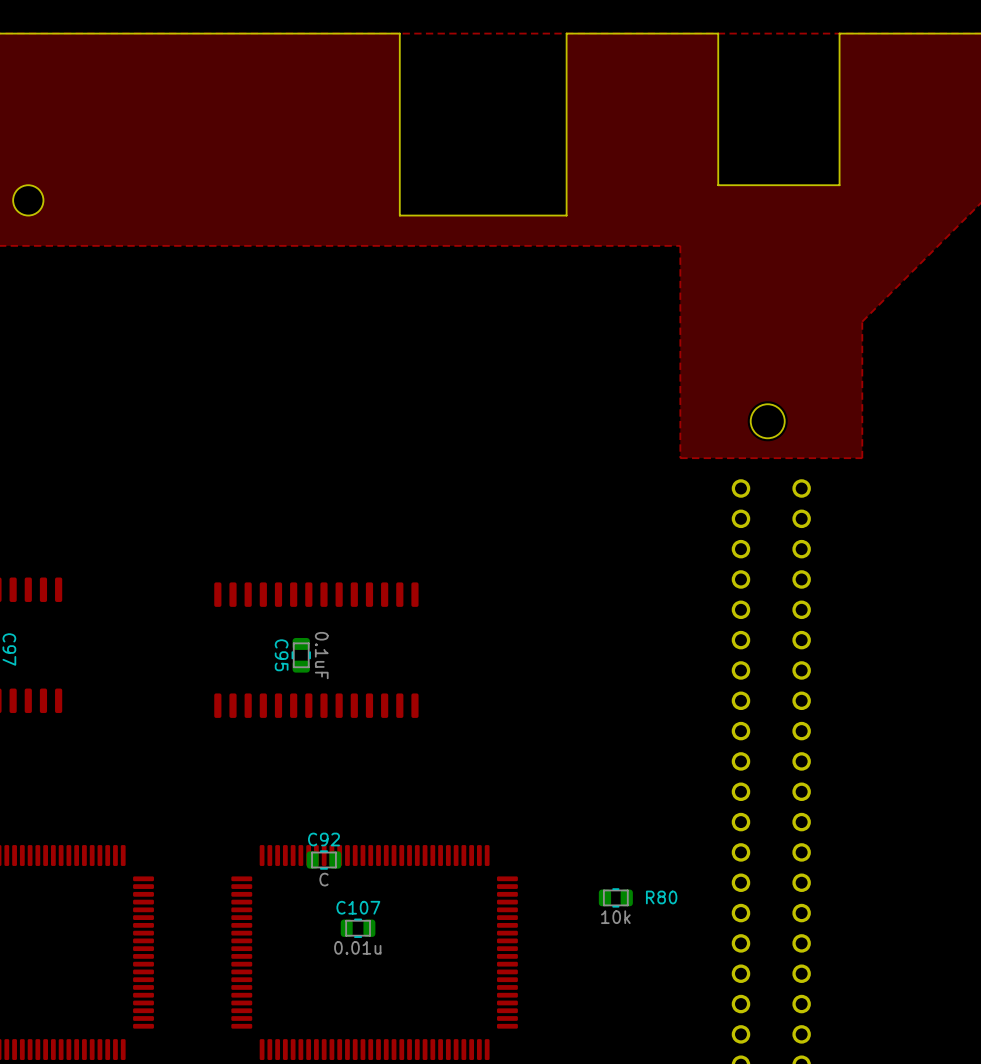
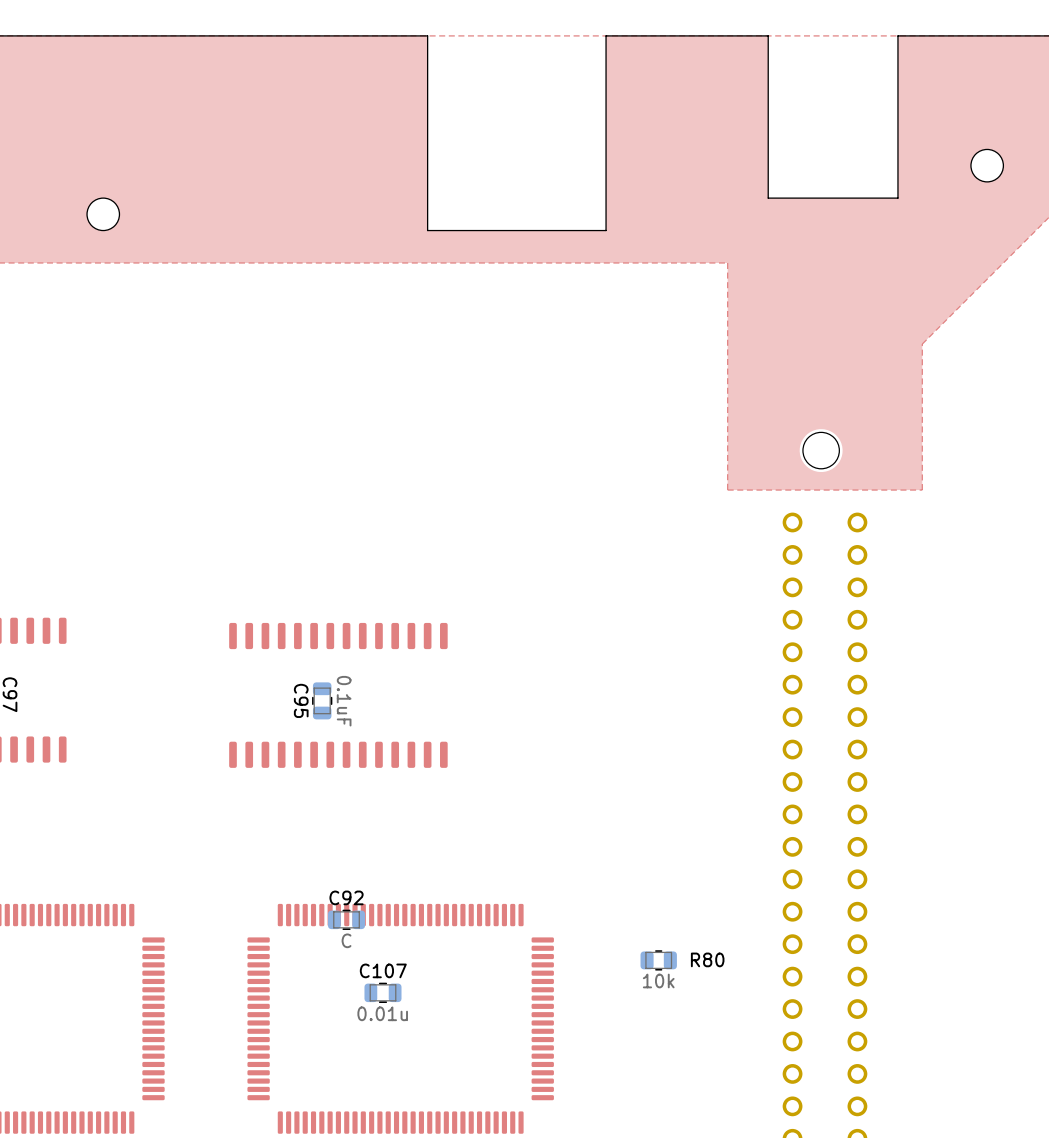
round board edge: none -> [970, 148, 1005, 183]
round board edge position: (28, 200) -> (103, 214)

